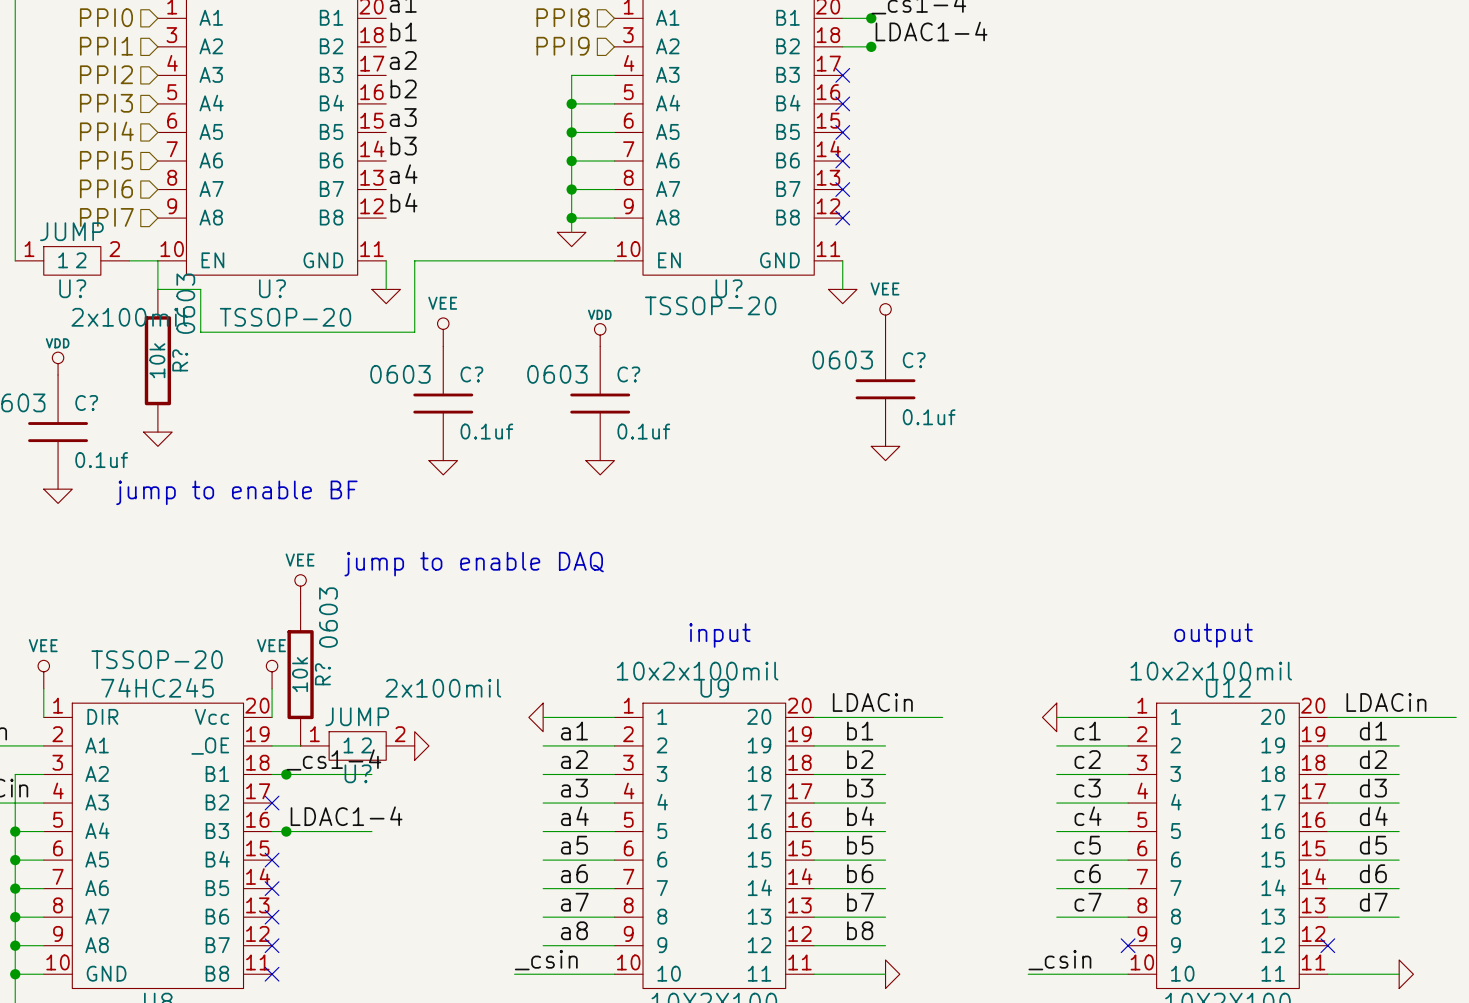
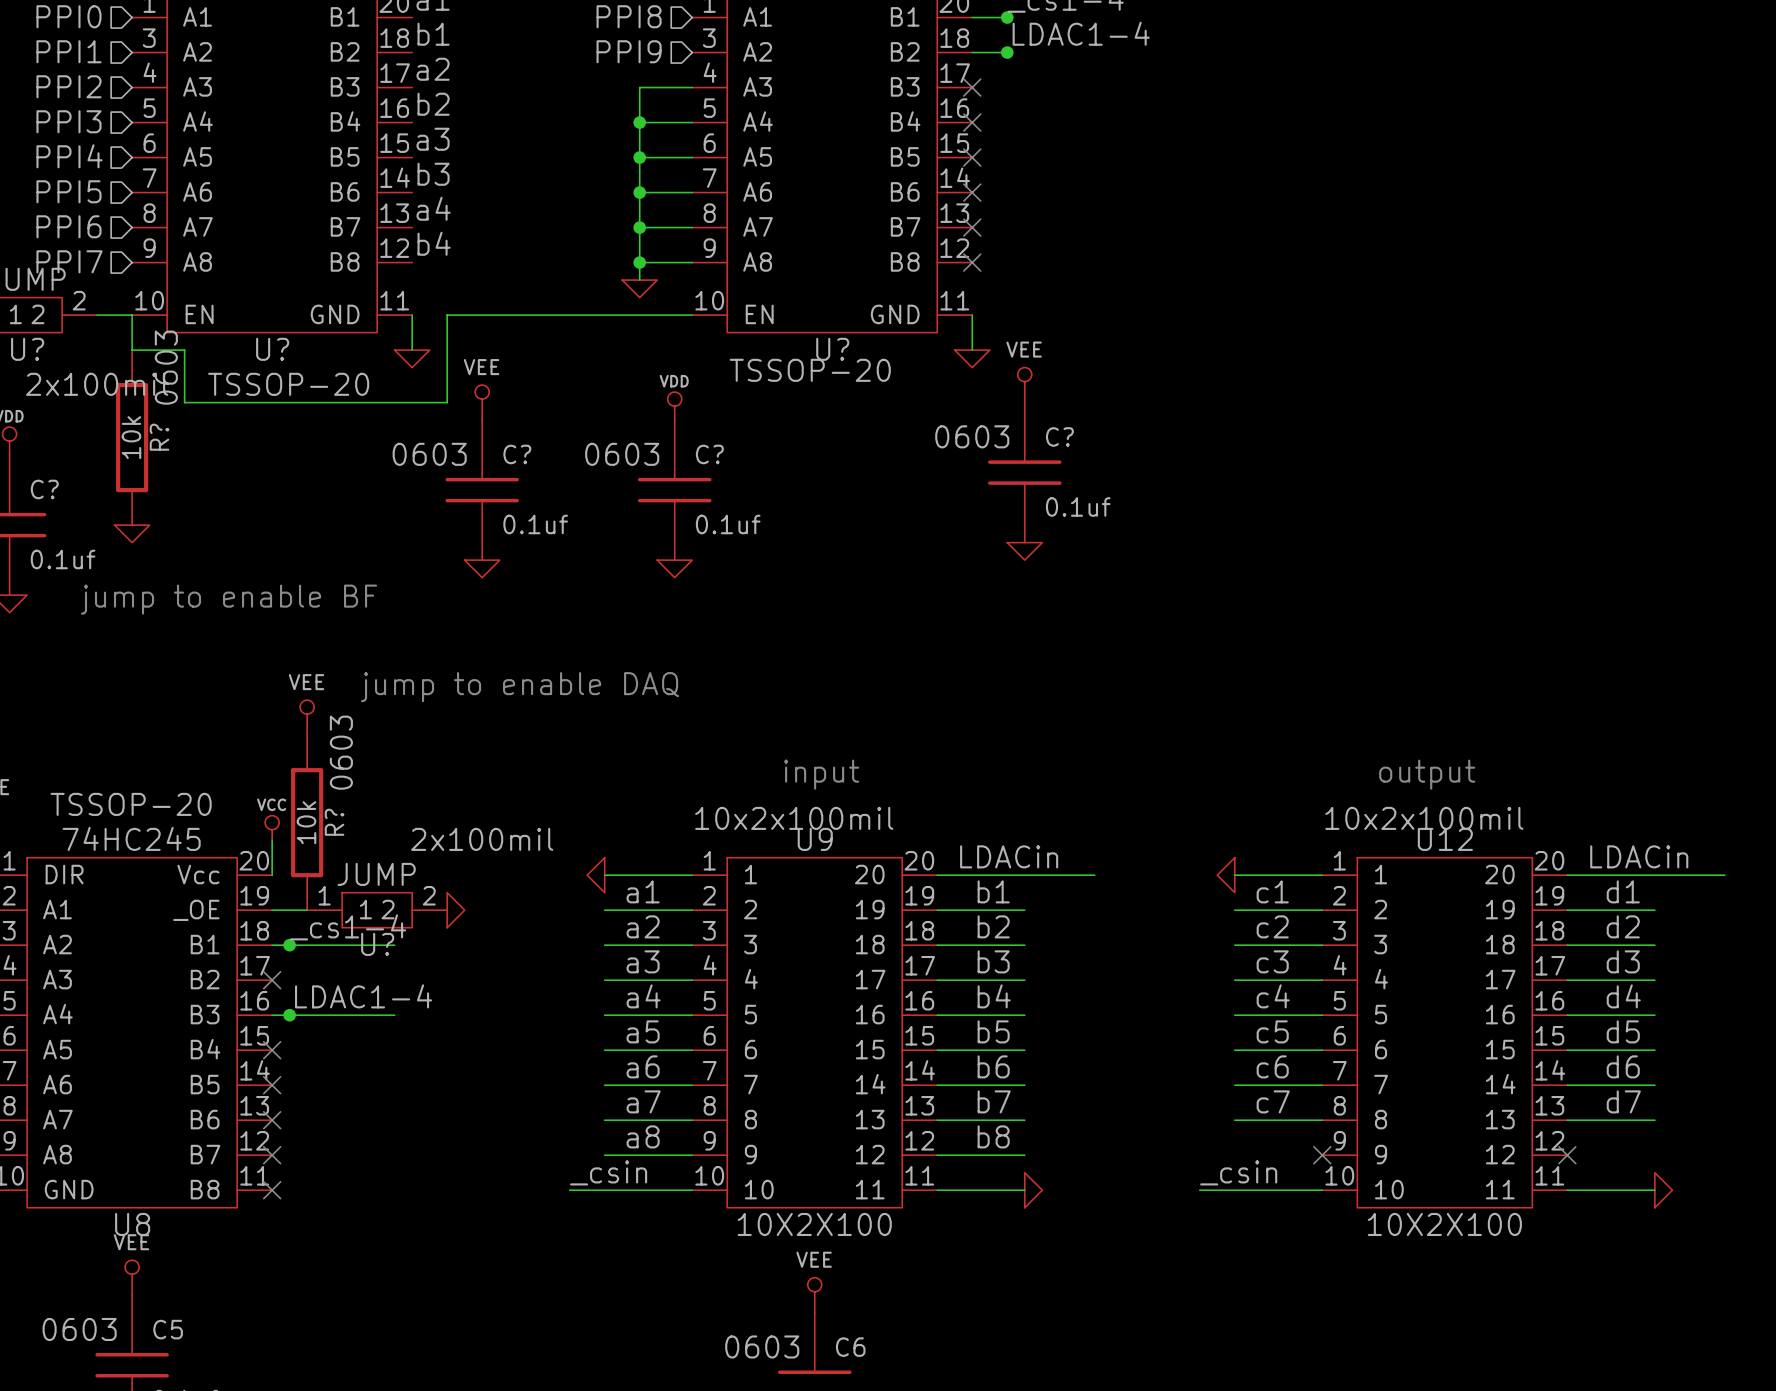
power symbol: VEE (272, 674) -> VCC (272, 827)

